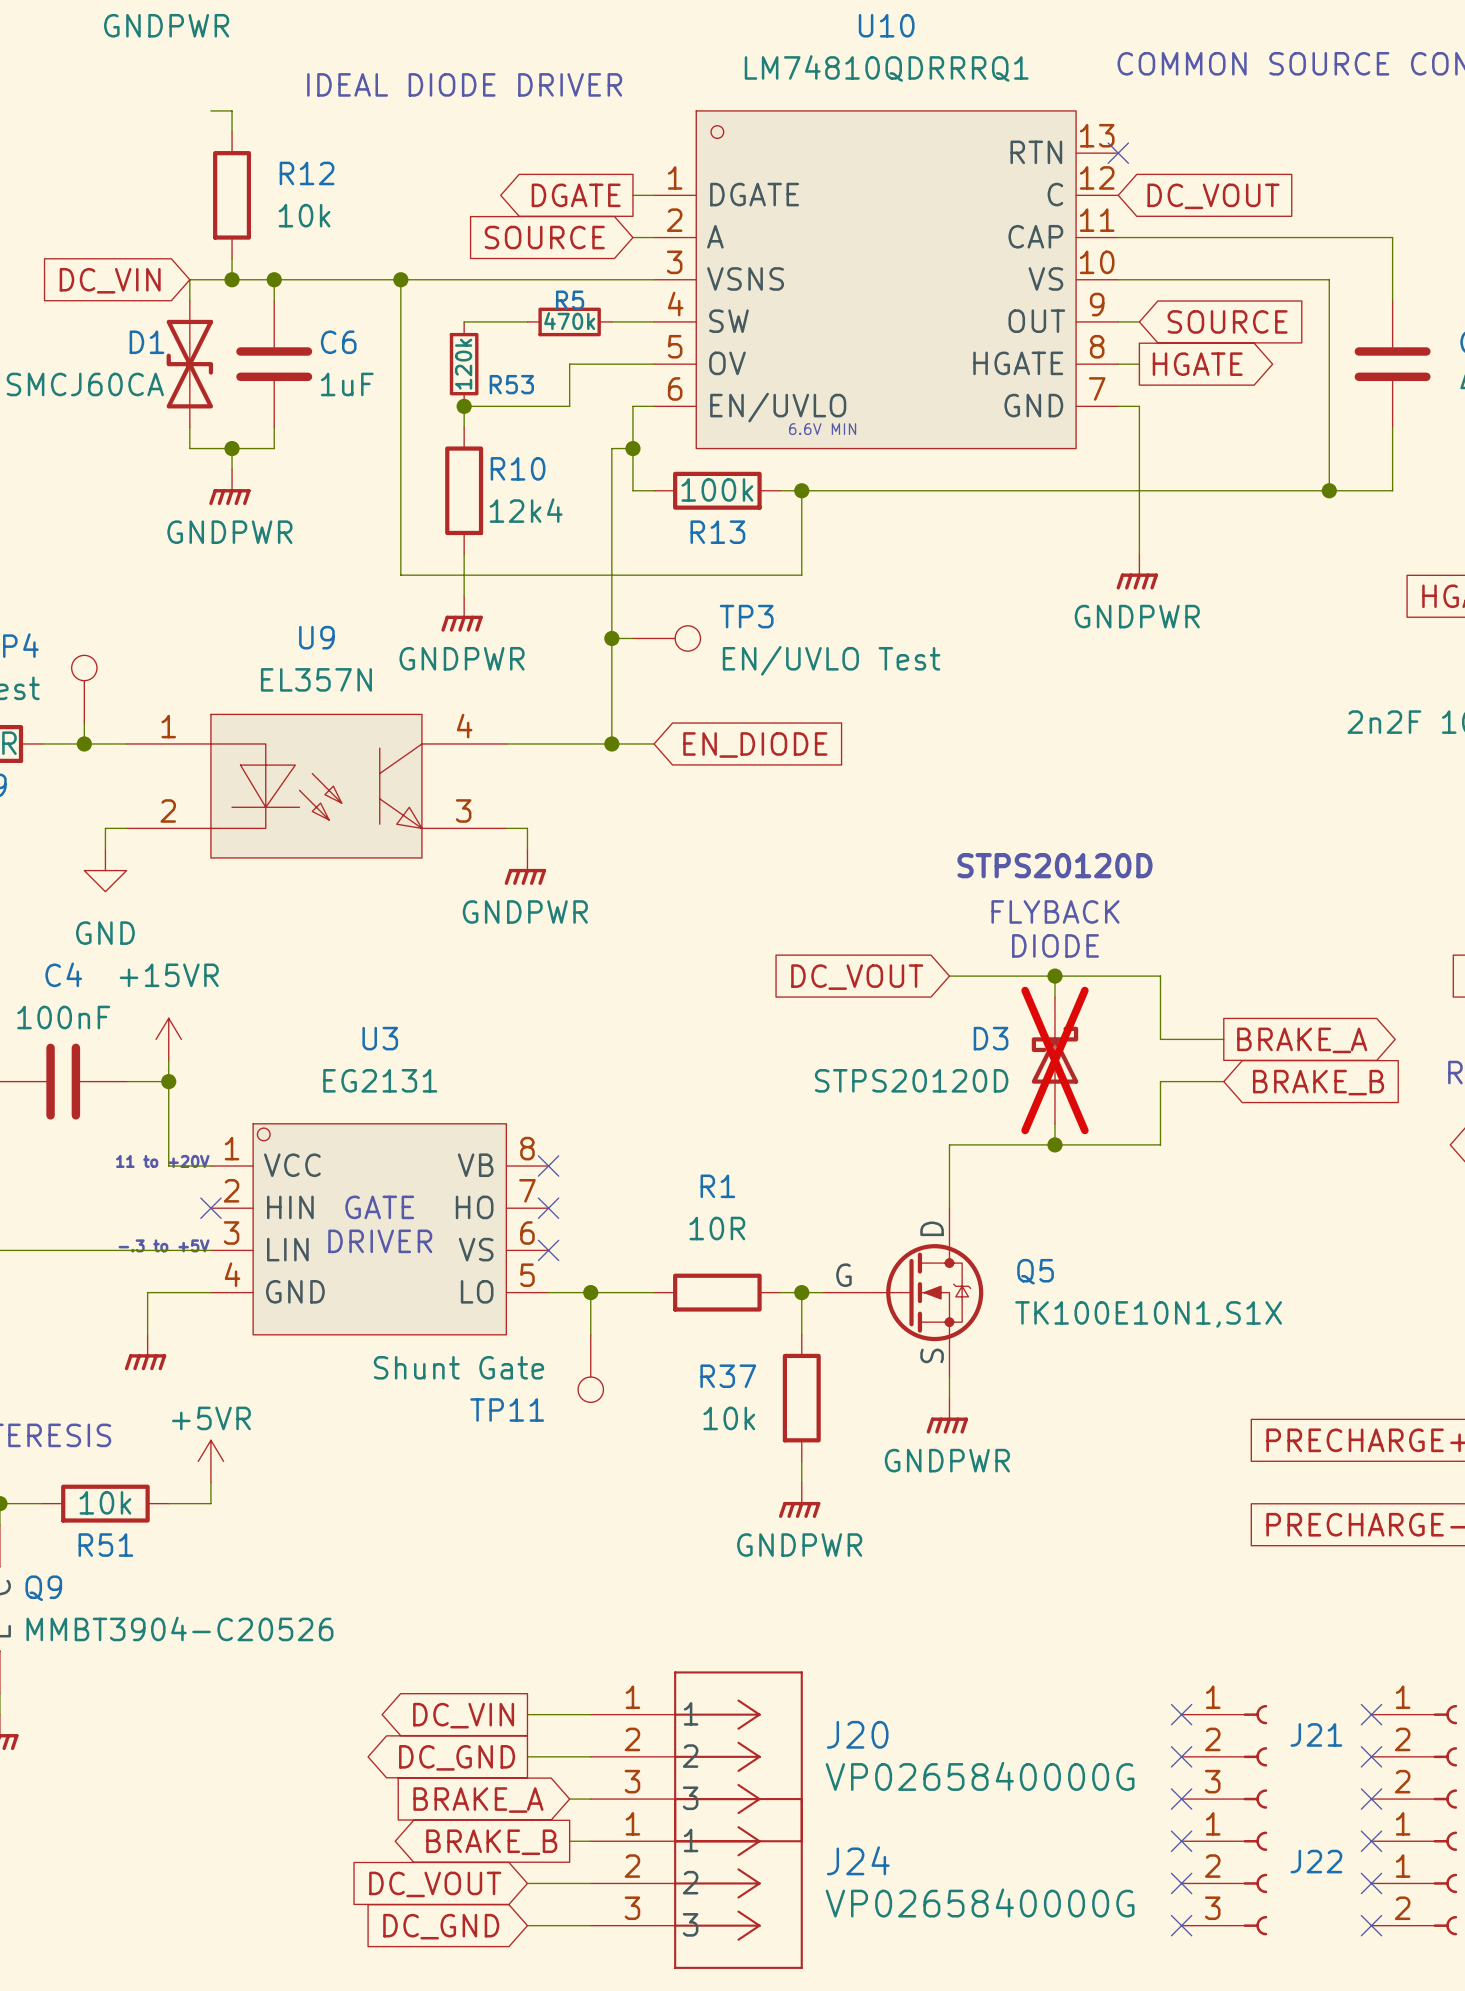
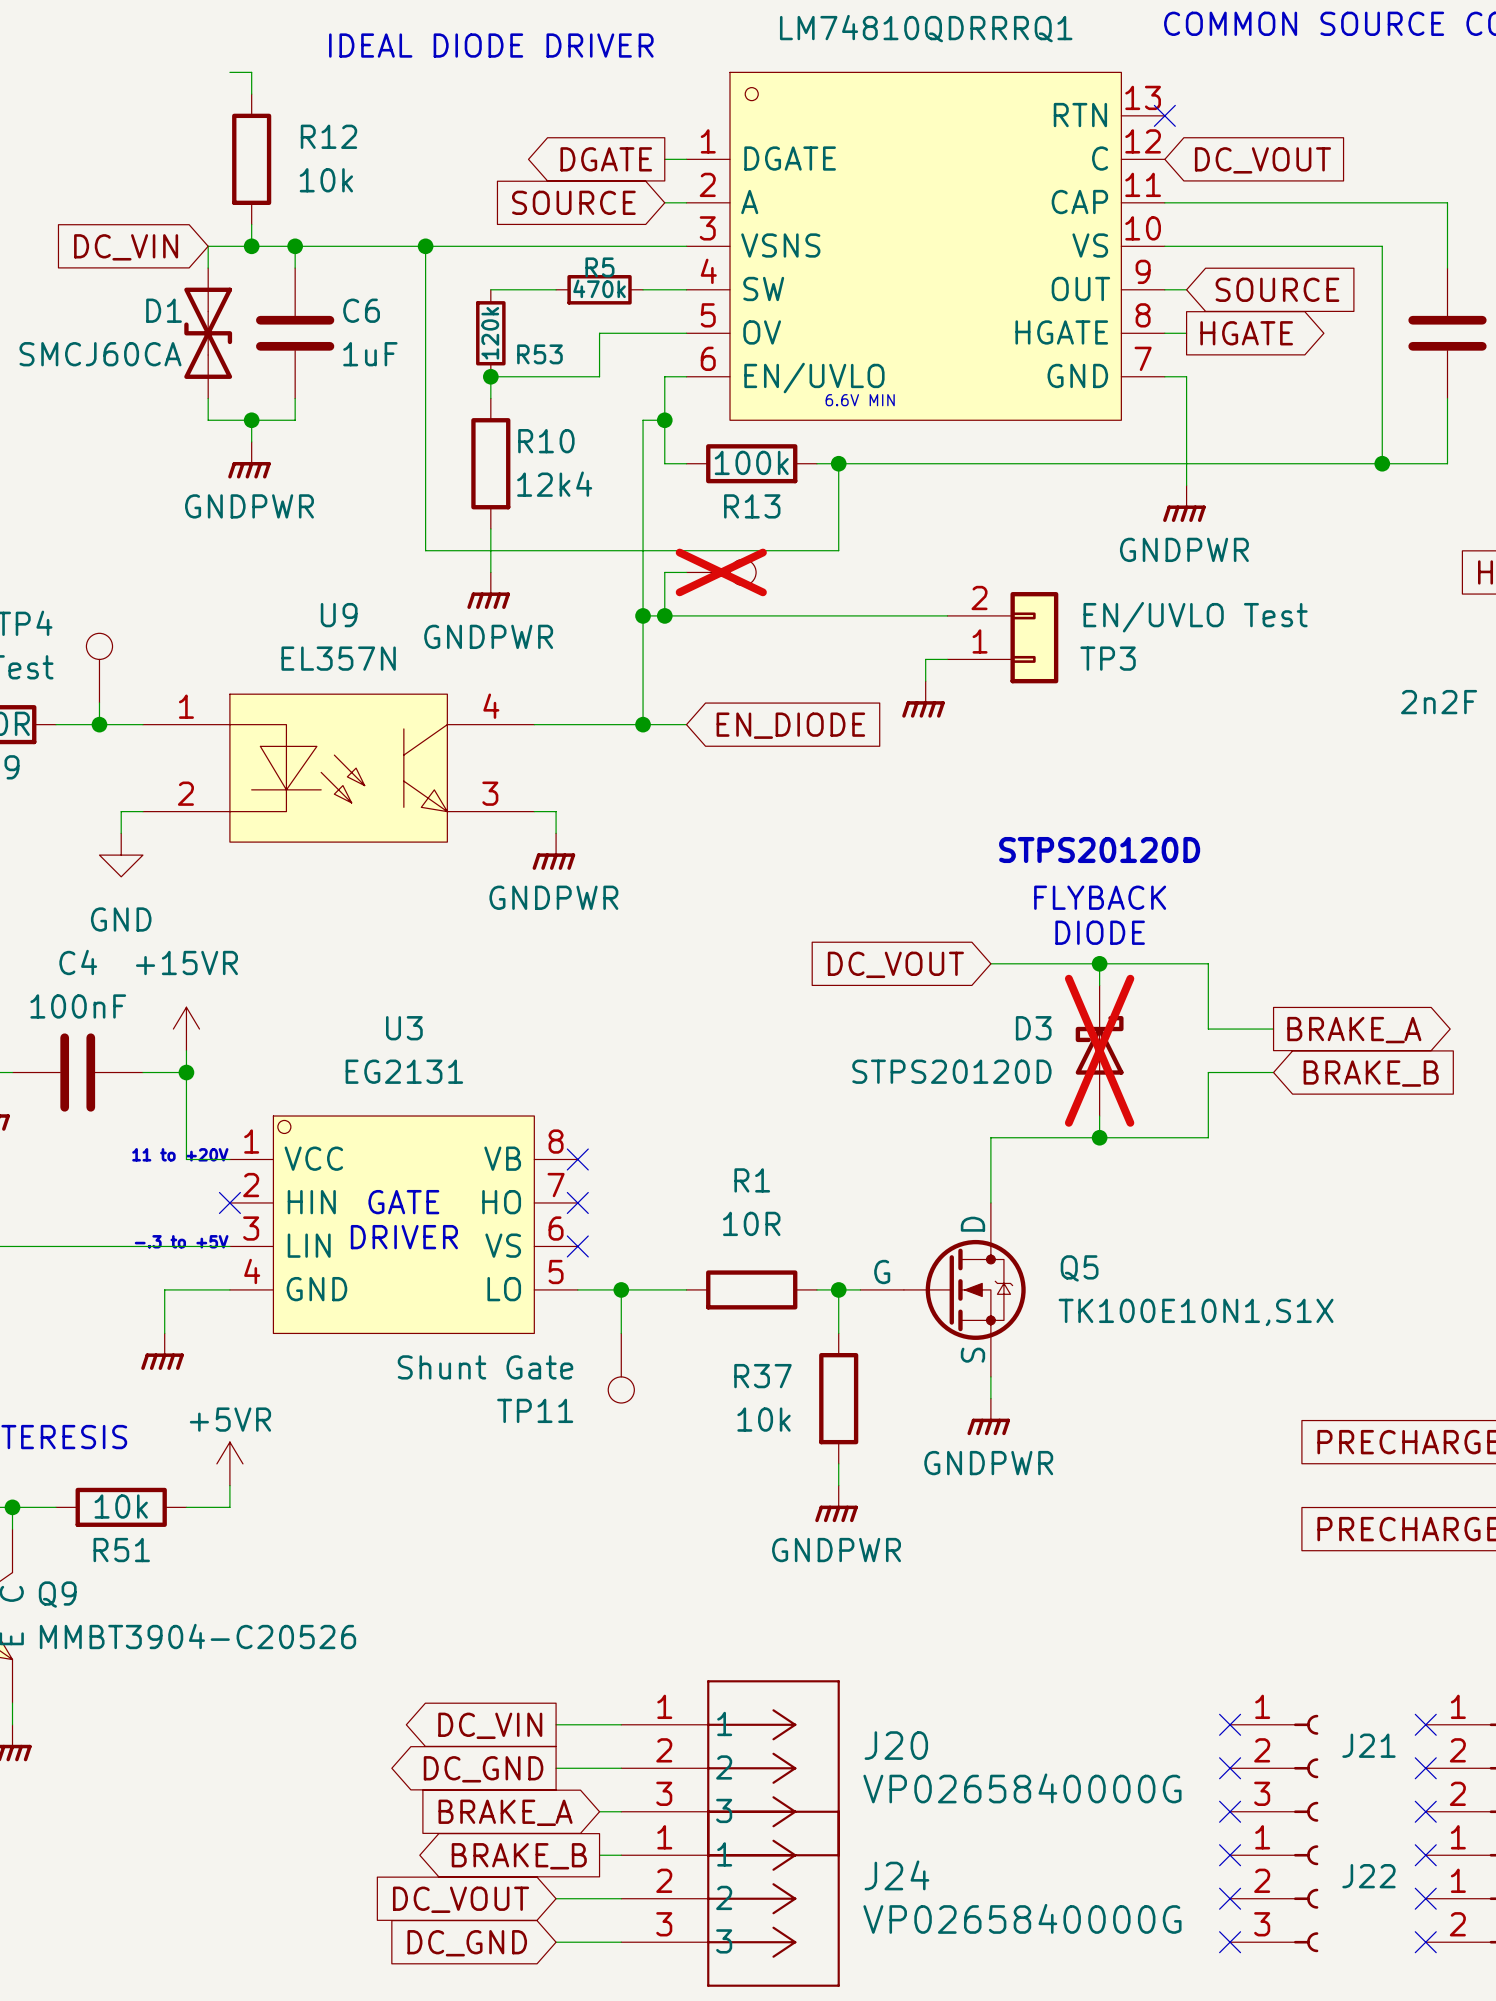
power symbol position: GNDPWR (1137, 571) -> GNDPWR (1184, 503)
wire: none -> (686, 572) (664, 572) (664, 615) (947, 615)
part: none -> (721, 572)
TP3 name position: TP3 (746, 616) -> TP3 (1108, 658)
TP3 symbol: [632, 625, 701, 652] -> [947, 592, 1059, 684]
junction: none -> (664, 615)
TP3 value position: EN/UVLO Test (831, 660) -> EN/UVLO Test (1195, 617)
wire: none -> (947, 659) (925, 659) (925, 681)
power symbol: none -> (923, 699)

